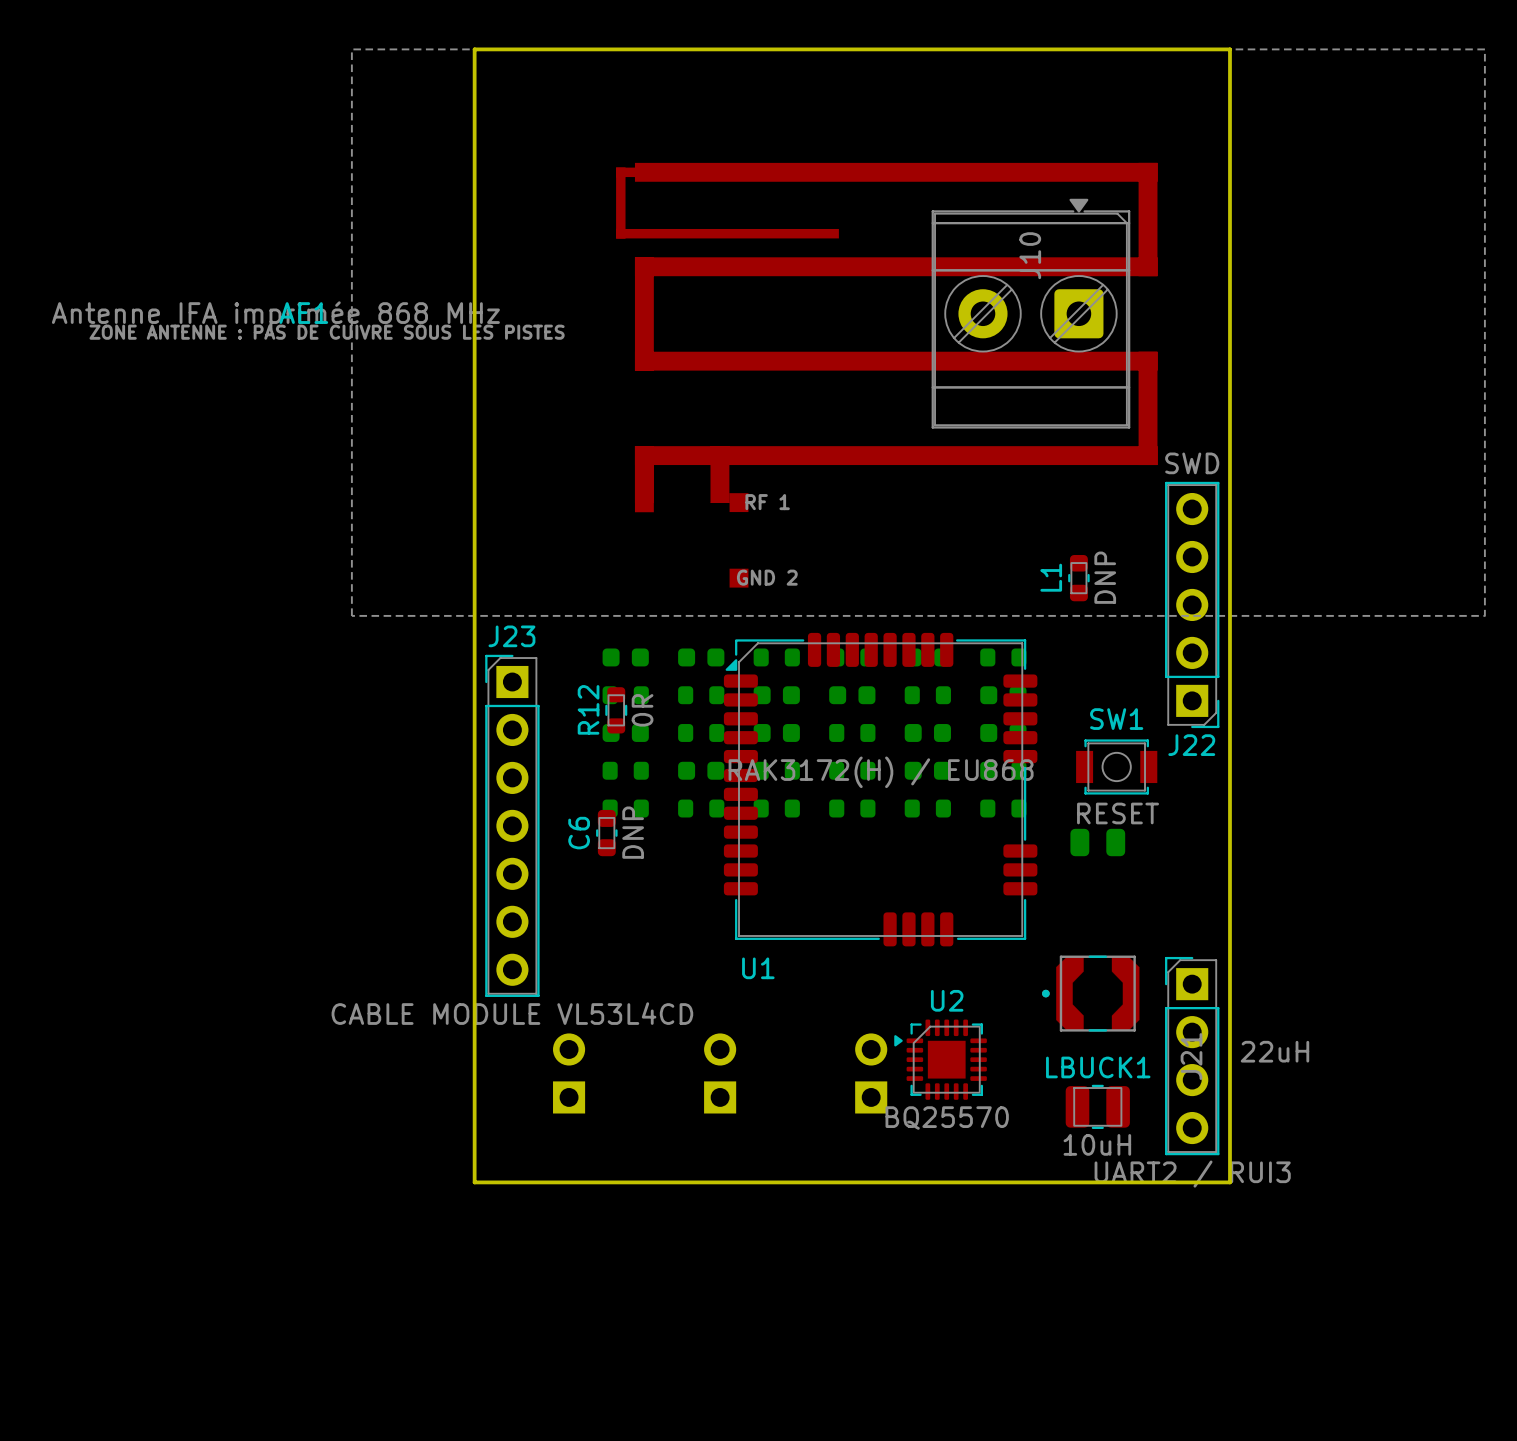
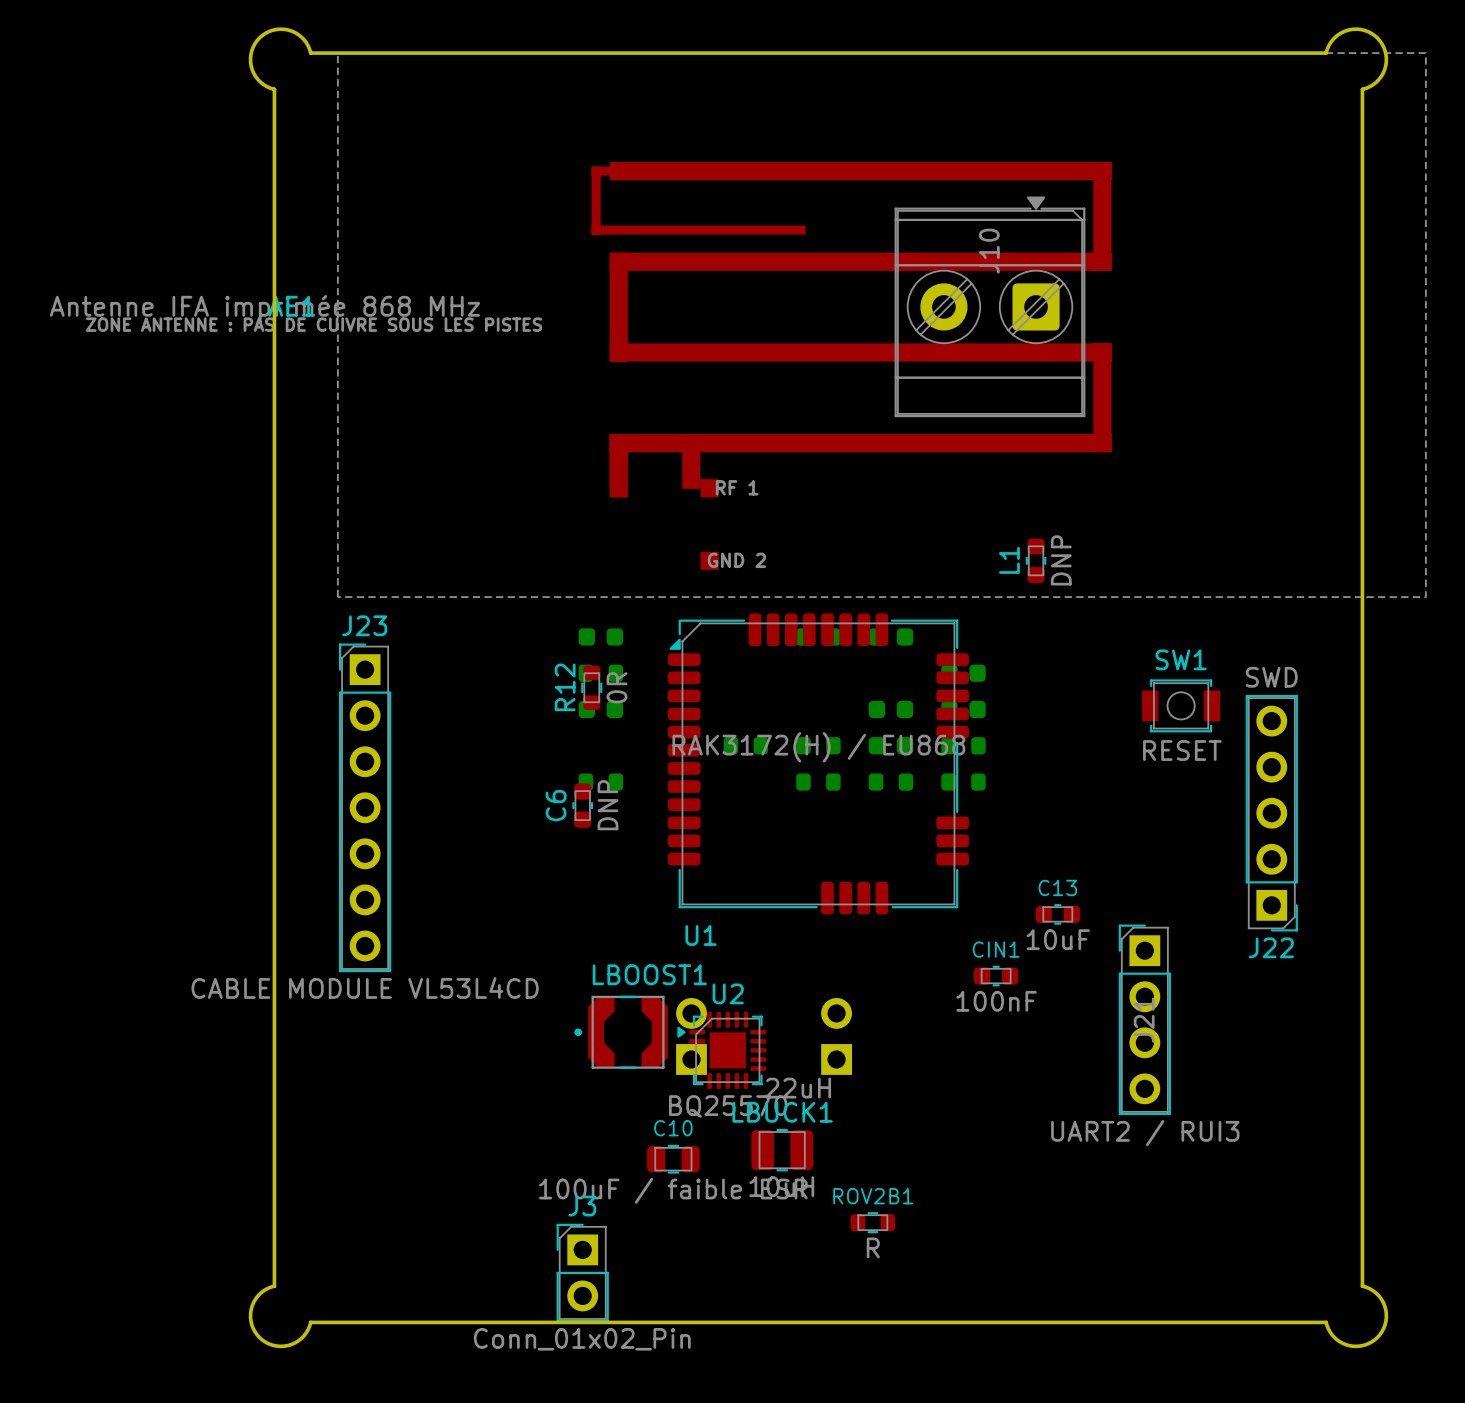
board edge: (474, 49) (474, 1182) (1229, 1182) (1229, 49) -> (455, 53) (310, 53) (301, 36) (291, 30) (280, 29) (268, 31) (259, 38) (250, 54) (251, 66) (255, 76) (263, 84) (274, 89) (274, 1286) (263, 1290) (255, 1298) (250, 1316) (256, 1334) (265, 1342) (276, 1345) (287, 1345) (298, 1341) (306, 1332) (310, 1322) (1326, 1322) (1330, 1332) (1338, 1341) (1356, 1346) (1371, 1342) (1380, 1334) (1386, 1320) (1384, 1305) (1376, 1292) (1362, 1286) (1362, 89) (1372, 84) (1381, 76) (1385, 66) (1386, 54) (1377, 38) (1368, 31) (1356, 29) (1338, 34) (1330, 42) (1326, 53) (1181, 53)
J22 position: (1192, 604) -> (1271, 813)
part: (701, 657) -> none
part: (776, 657) -> none
part: (1003, 657) -> none
part: (701, 695) -> none
CIN1 side: bottom (776, 695) -> top (996, 976)
C13 side: bottom (852, 695) -> top (1057, 914)
part: (927, 695) -> none
part: (701, 732) -> none
part: (776, 732) -> none
part: (852, 732) -> none
SW1 position: (1116, 766) -> (1181, 705)
part: (625, 770) -> none
part: (701, 770) -> none
U1 position: (880, 789) -> (818, 763)
part: (701, 808) -> none
part: (776, 808) -> none
J23 position: (512, 825) -> (365, 807)
part: (1097, 842) -> none
part: 22uH (1090, 993) -> none
U2 position: (940, 1059) -> (721, 1050)
LBOOST1: none -> 22uH (621, 1032)
J3 side: bottom (569, 1073) -> top (582, 1272)
LBUCK1 position: (1097, 1106) -> (782, 1150)
C10: none -> 100uF / faible ESR (673, 1159)
ROV2B1: none -> R (872, 1222)

